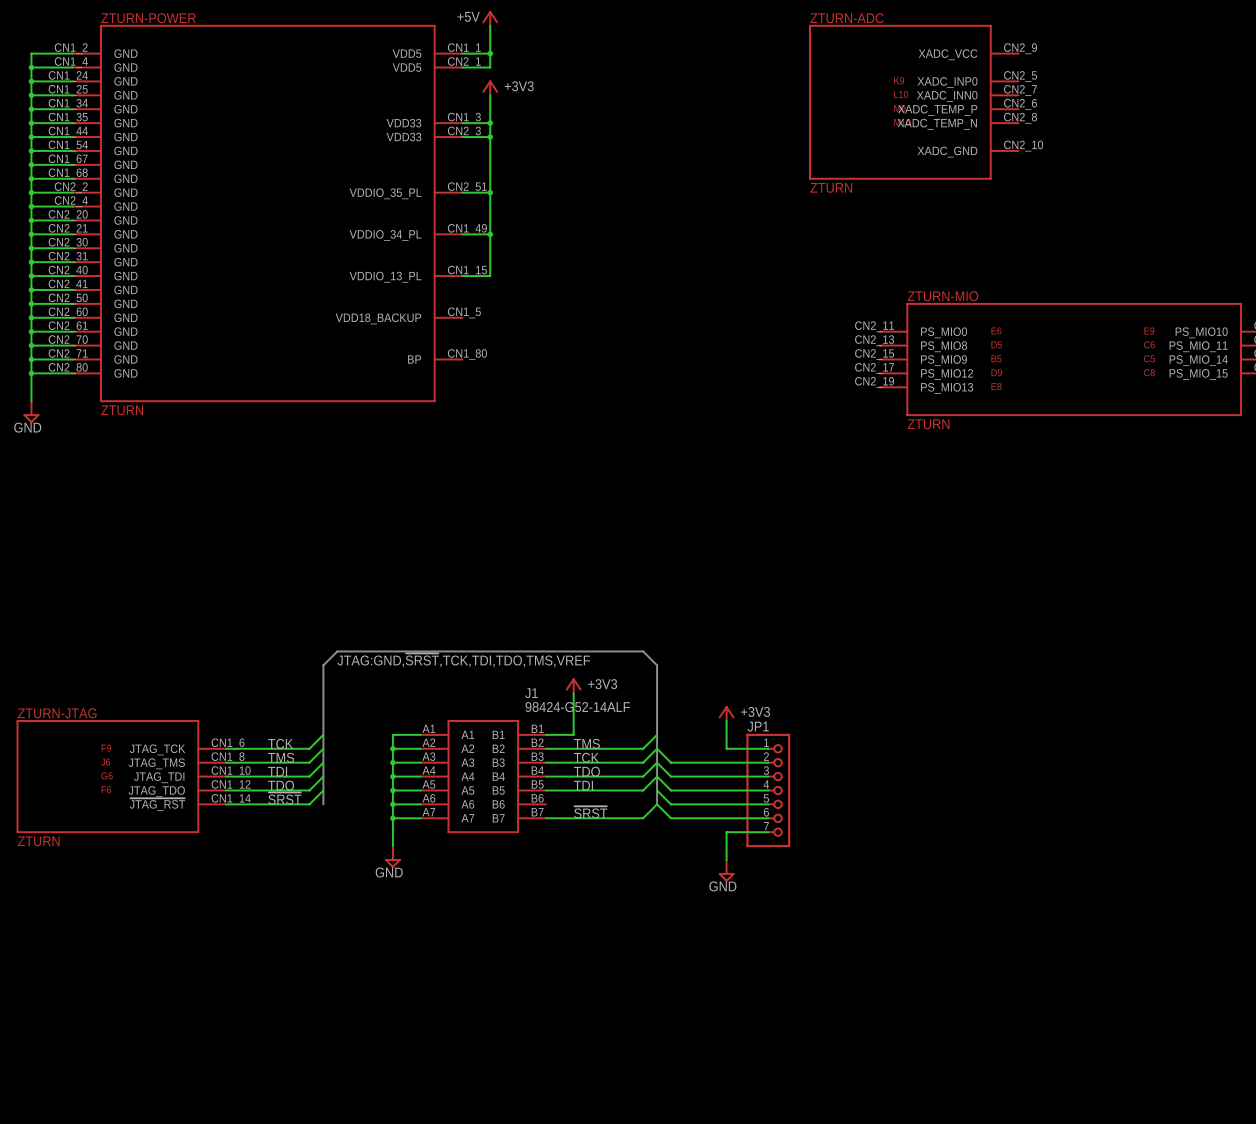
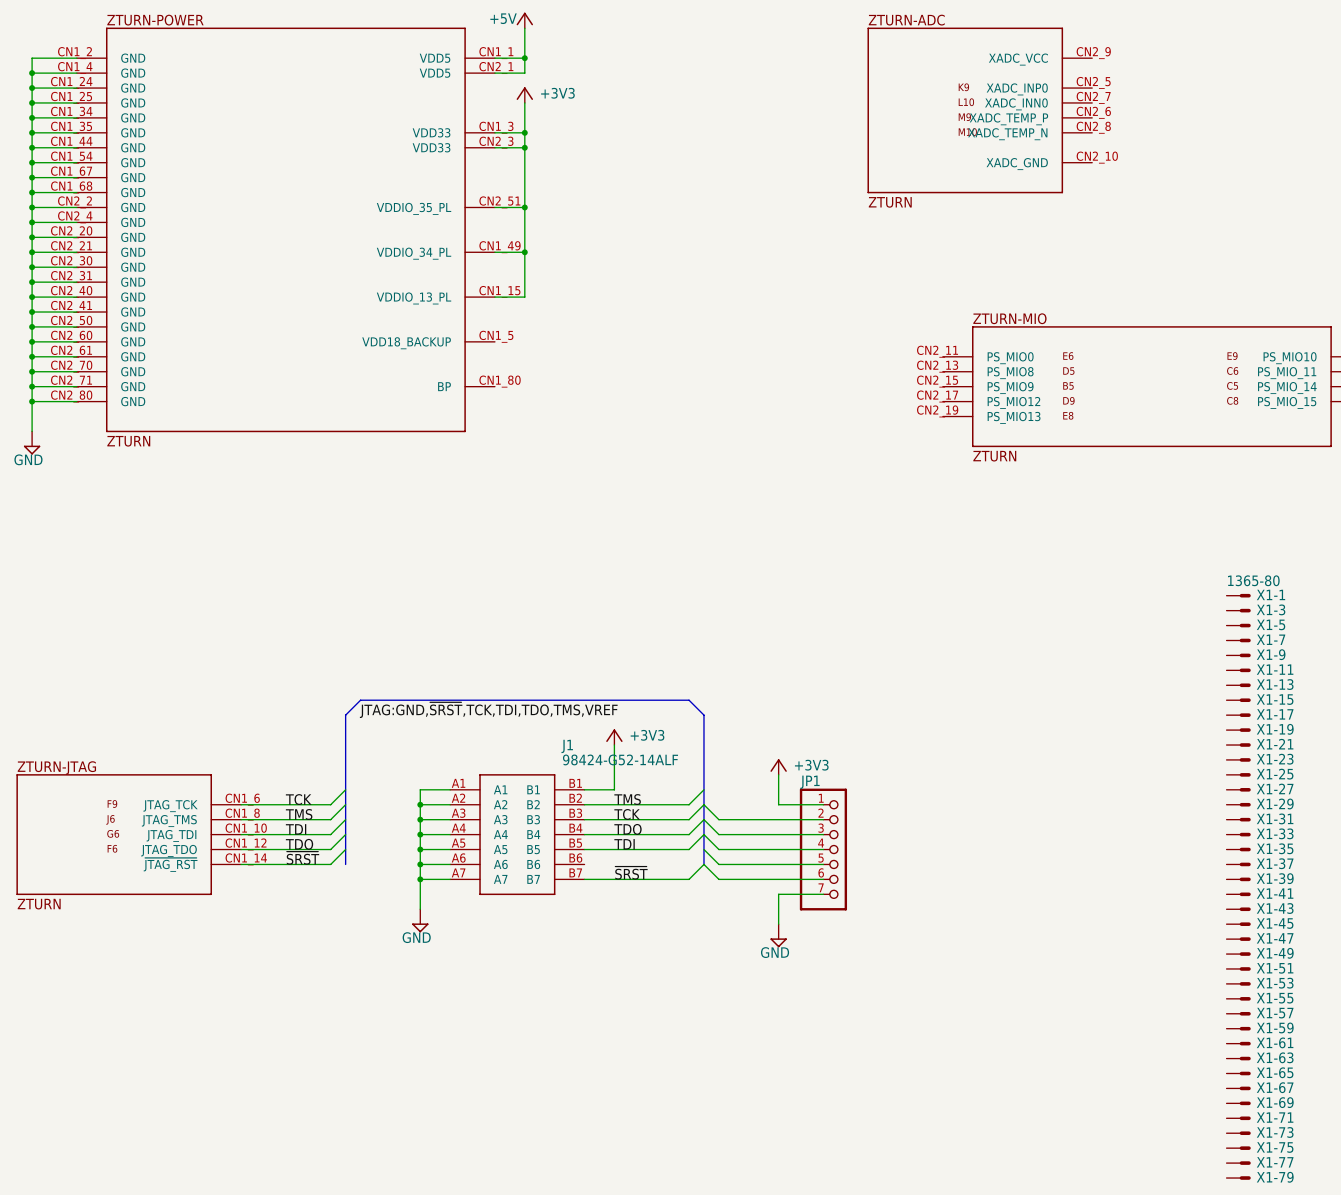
X1-1: none -> 1365-80 (1238, 595)
X1-3: none -> (1238, 610)
X1-5: none -> (1238, 625)
X1-7: none -> (1238, 640)
X1-9: none -> (1238, 655)
X1-11: none -> (1238, 670)
X1-13: none -> (1238, 685)
X1-15: none -> (1238, 700)
X1-17: none -> (1238, 715)
X1-19: none -> (1238, 730)
X1-21: none -> (1238, 745)
X1-23: none -> (1238, 759)
X1-25: none -> (1238, 774)
X1-27: none -> (1238, 789)
X1-29: none -> (1238, 804)
X1-31: none -> (1238, 819)
X1-33: none -> (1238, 834)
X1-35: none -> (1238, 849)
X1-37: none -> (1238, 864)
X1-39: none -> (1238, 879)
X1-41: none -> (1238, 894)
X1-43: none -> (1238, 909)
X1-45: none -> (1238, 924)
X1-47: none -> (1238, 939)
X1-49: none -> (1238, 954)
X1-51: none -> (1238, 968)
X1-53: none -> (1238, 983)
X1-55: none -> (1238, 998)
X1-57: none -> (1238, 1013)
X1-59: none -> (1238, 1028)
X1-61: none -> (1238, 1043)
X1-63: none -> (1238, 1058)
X1-65: none -> (1238, 1073)
X1-67: none -> (1238, 1088)
X1-69: none -> (1238, 1103)
X1-71: none -> (1238, 1118)
X1-73: none -> (1238, 1133)
X1-75: none -> (1238, 1148)
X1-77: none -> (1238, 1163)
X1-79: none -> (1238, 1178)

